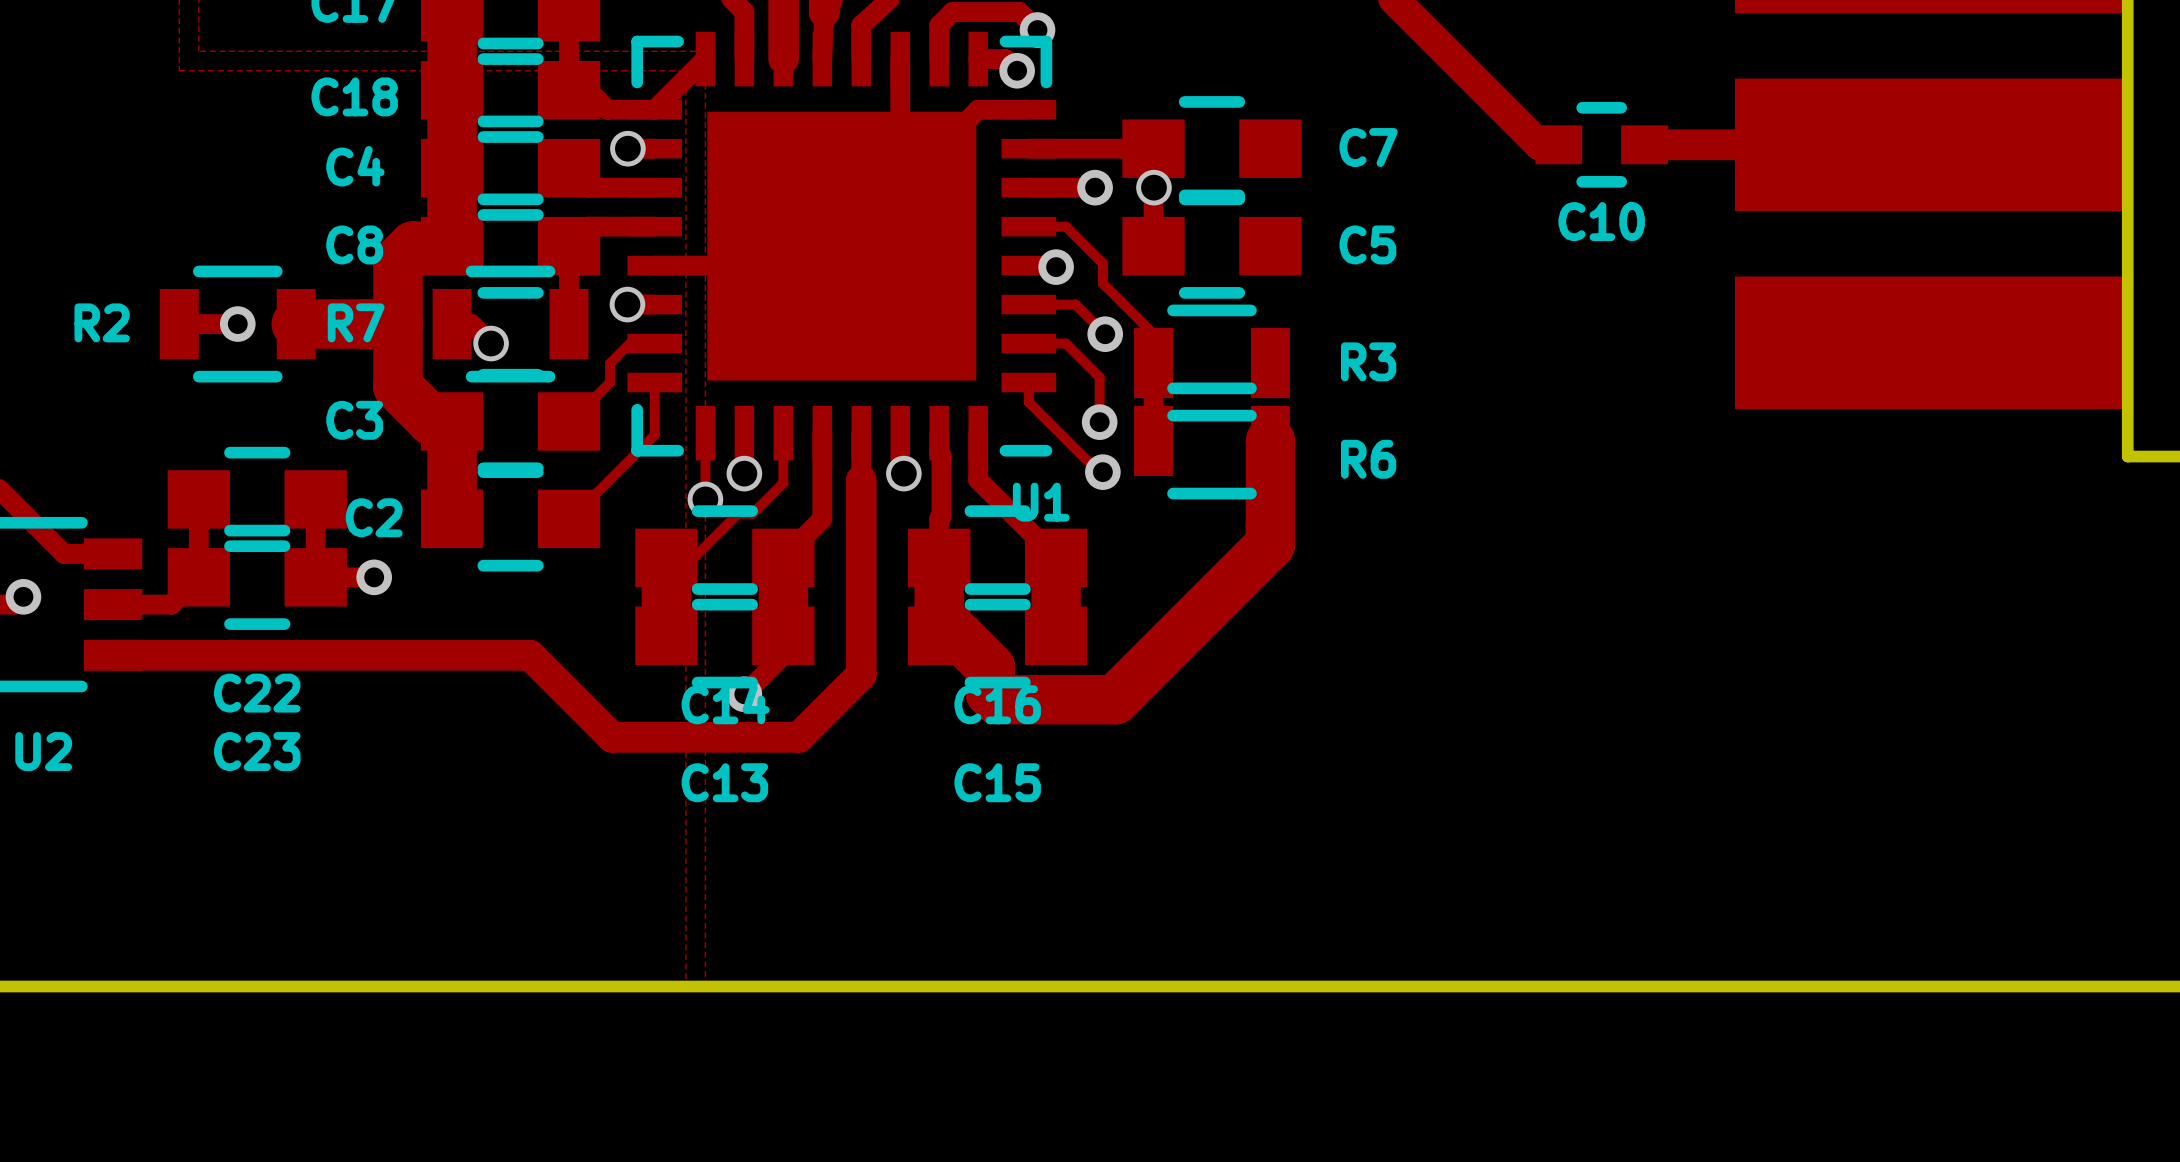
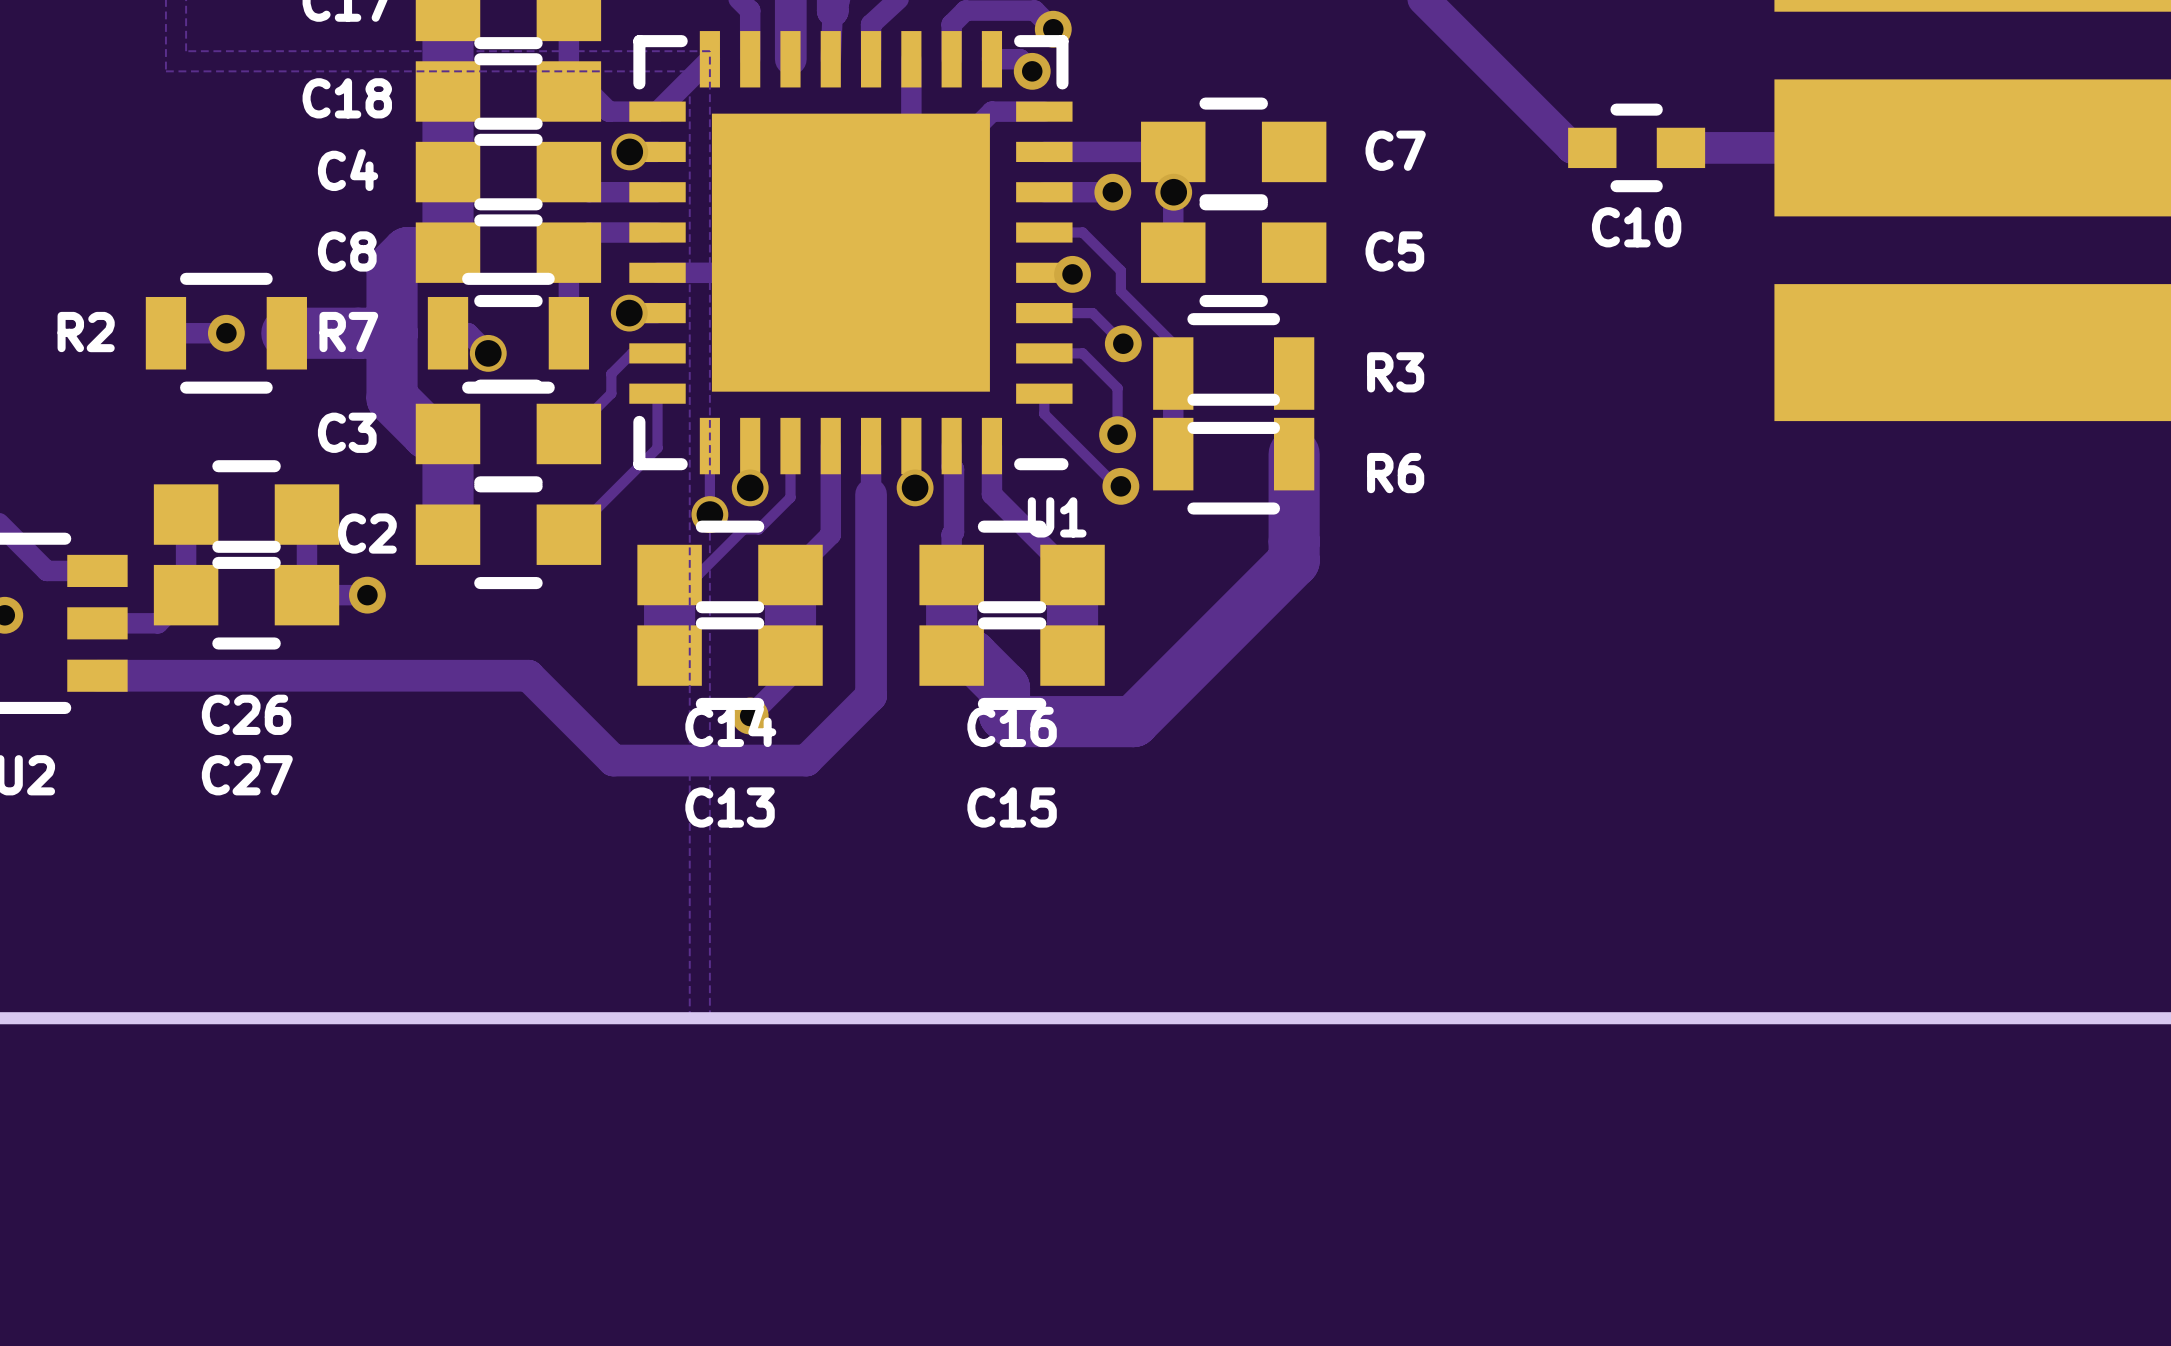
C22 name: C22 (257, 693) -> C26 (246, 714)
C23 name: C23 (257, 751) -> C27 (247, 775)

